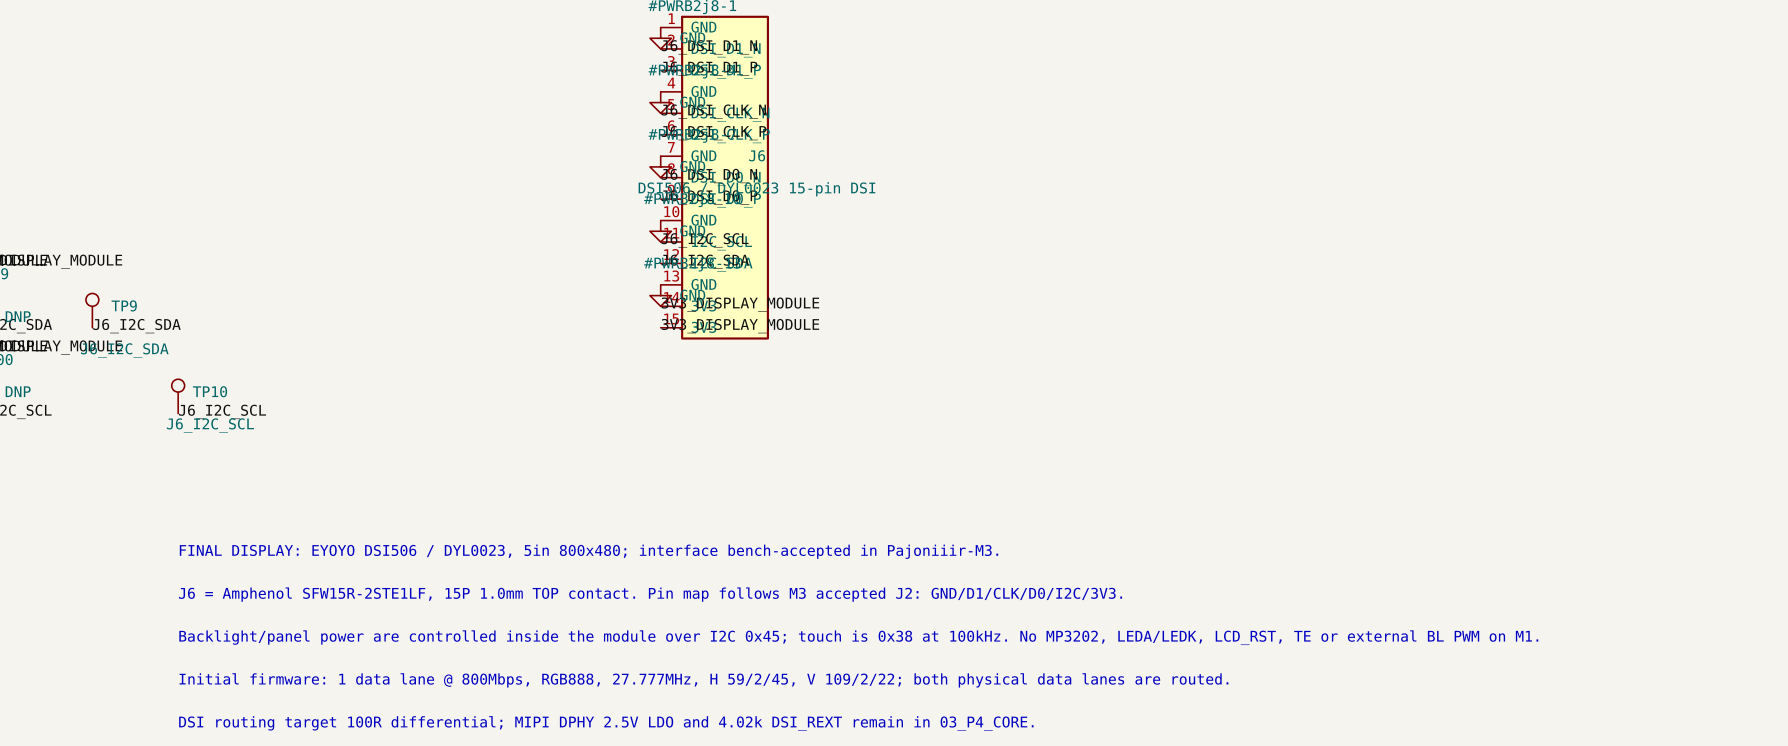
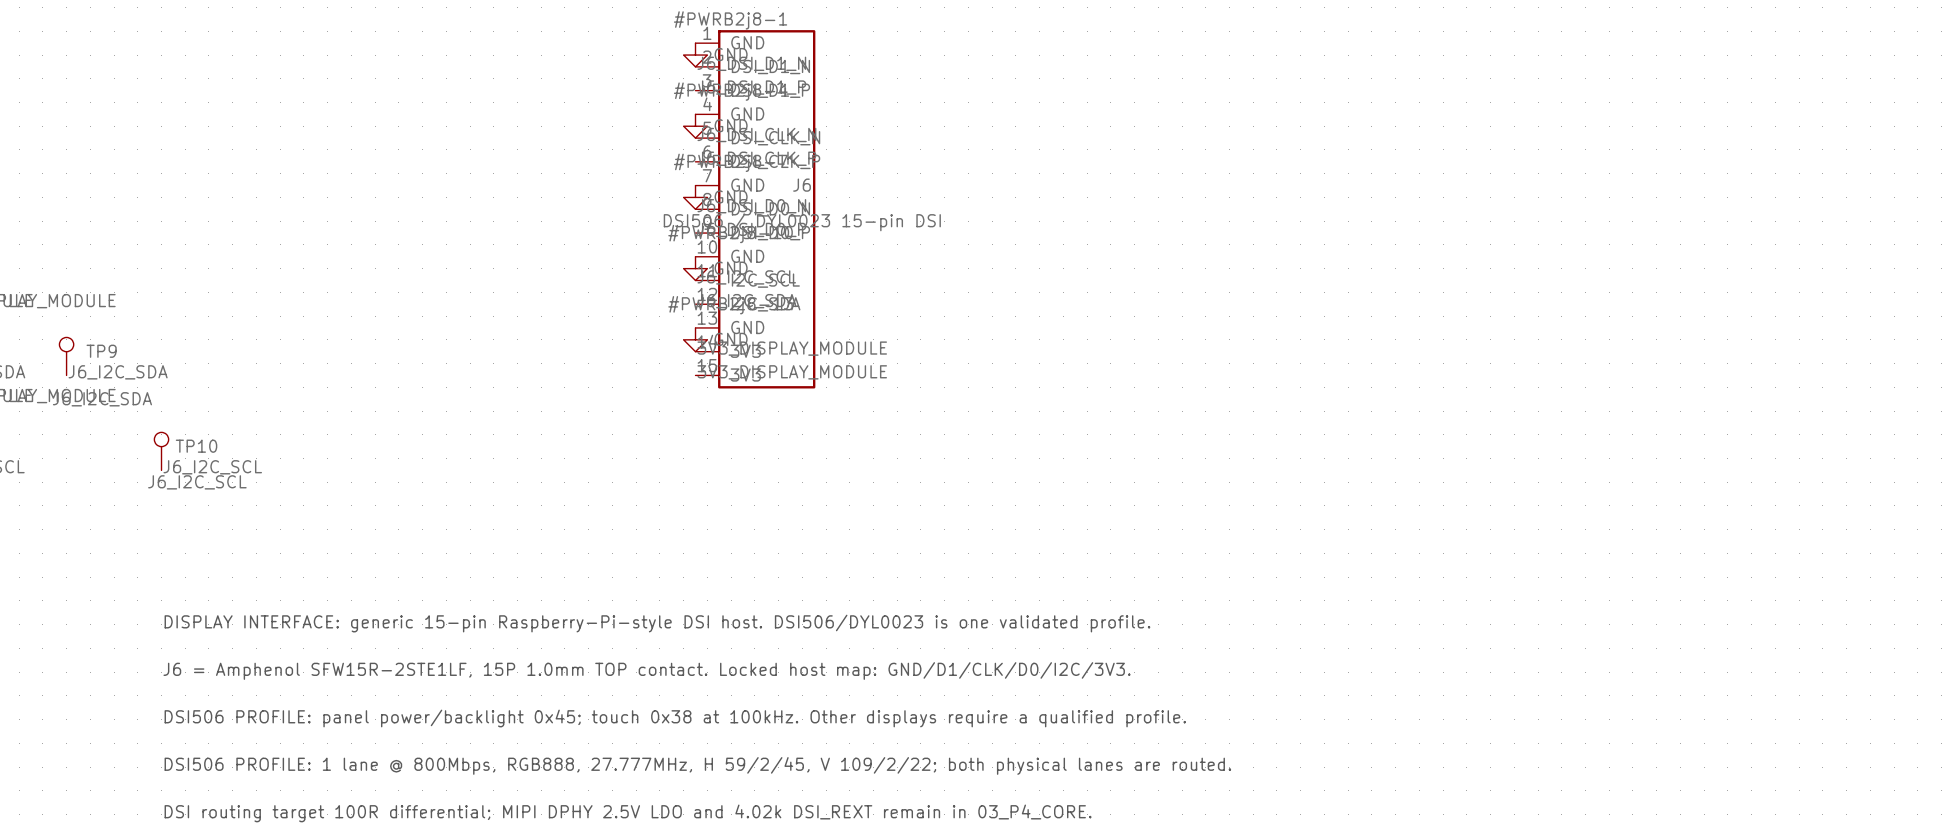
text: FINAL DISPLAY: EYOYO DSI506 / DYL0023, 5in 800x480; interface bench-accepted in Pajoniiir-M3. (588, 551) -> DISPLAY INTERFACE: generic 15-pin Raspberry-Pi-style DSI host. DSI506/DYL0023 is one validated profile. (657, 623)
text: J6 = Amphenol SFW15R-2STE1LF, 15P 1.0mm TOP contact. Pin map follows M3 accepted J2: GND/D1/CLK/D0/I2C/3V3. (650, 594) -> J6 = Amphenol SFW15R-2STE1LF, 15P 1.0mm TOP contact. Locked host map: GND/D1/CLK/D0/I2C/3V3. (647, 671)
text: Backlight/panel power are controlled inside the module over I2C 0x45; touch is 0x38 at 100kHz. No MP3202, LEDA/LEDK, LCD_RST, TE or external BL PWM on M1. (858, 637) -> DSI506 PROFILE: panel power/backlight 0x45; touch 0x38 at 100kHz. Other displays require a qualified profile. (675, 718)
text: Initial firmware: 1 data lane @ 800Mbps, RGB888, 27.777MHz, H 59/2/45, V 109/2/22; both physical data lanes are routed. (703, 680) -> DSI506 PROFILE: 1 lane @ 800Mbps, RGB888, 27.777MHz, H 59/2/45, V 109/2/22; both physical lanes are routed. (697, 765)

